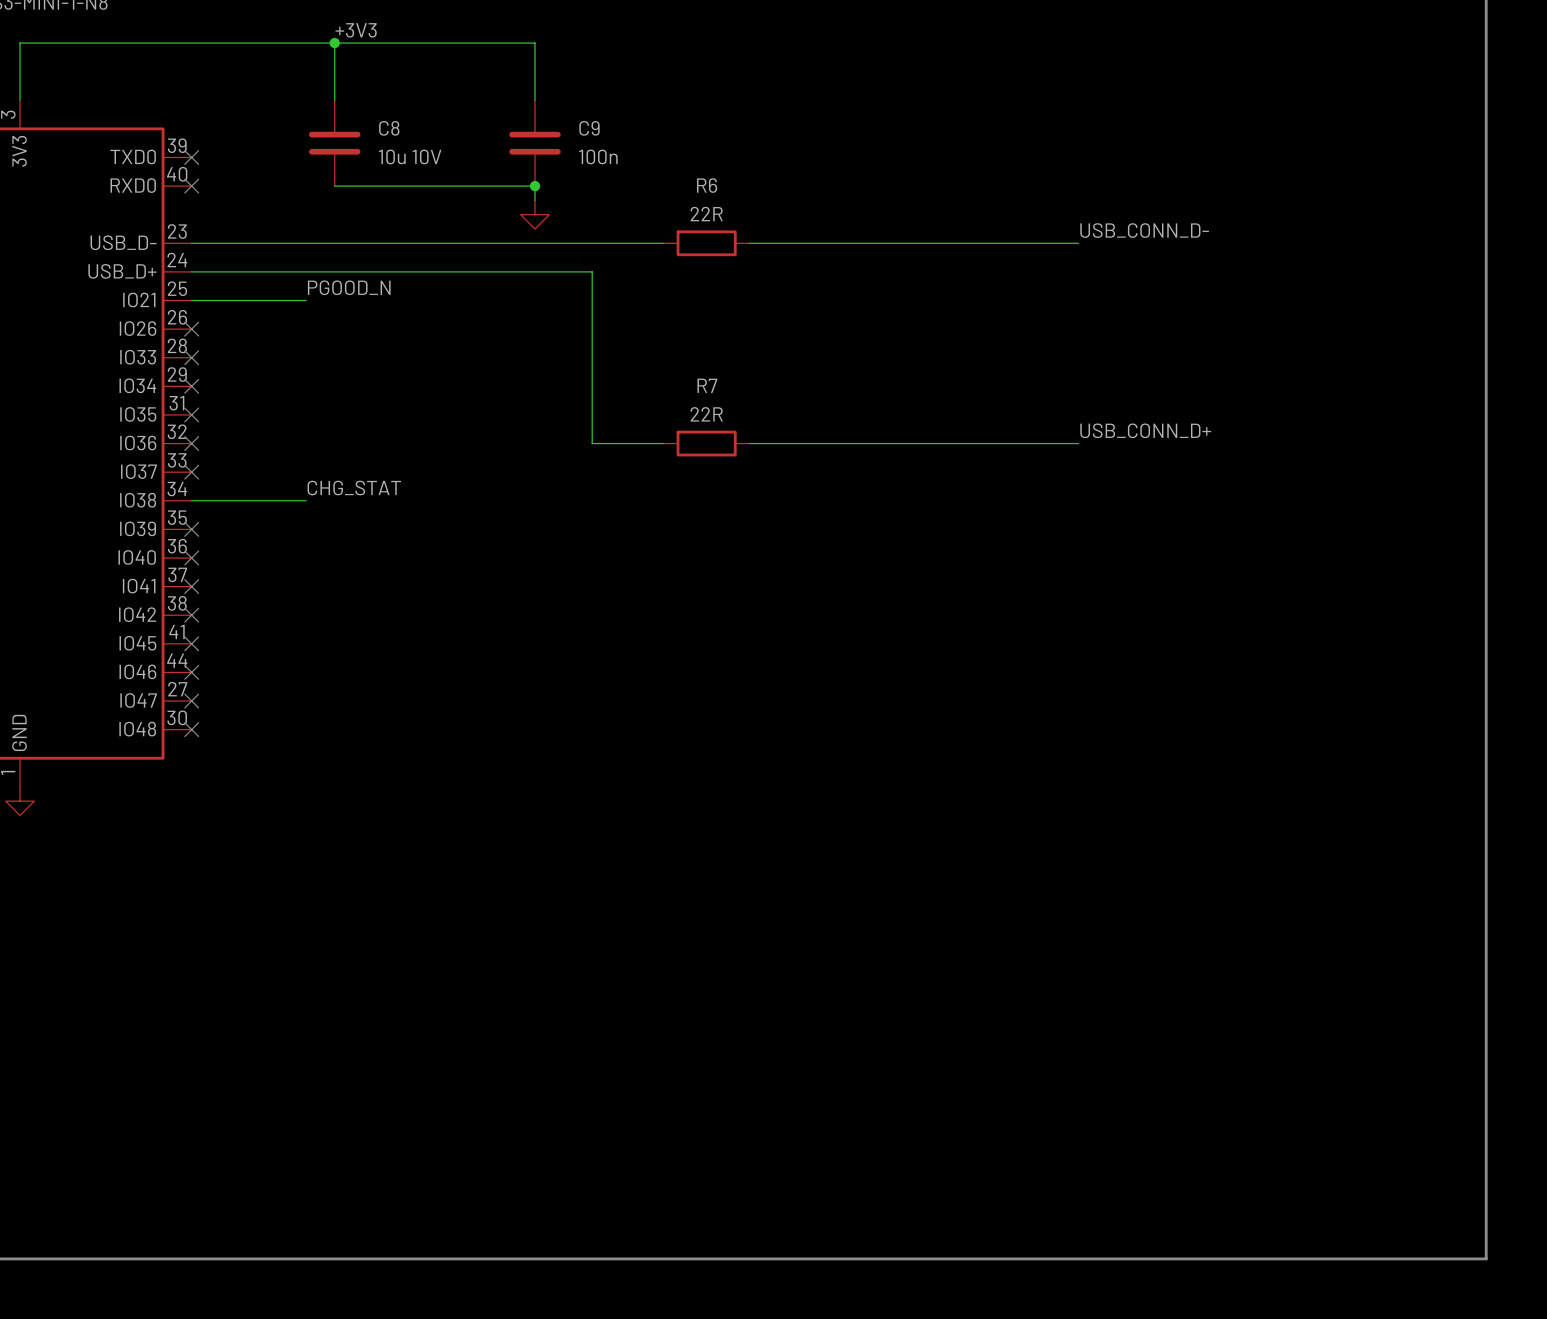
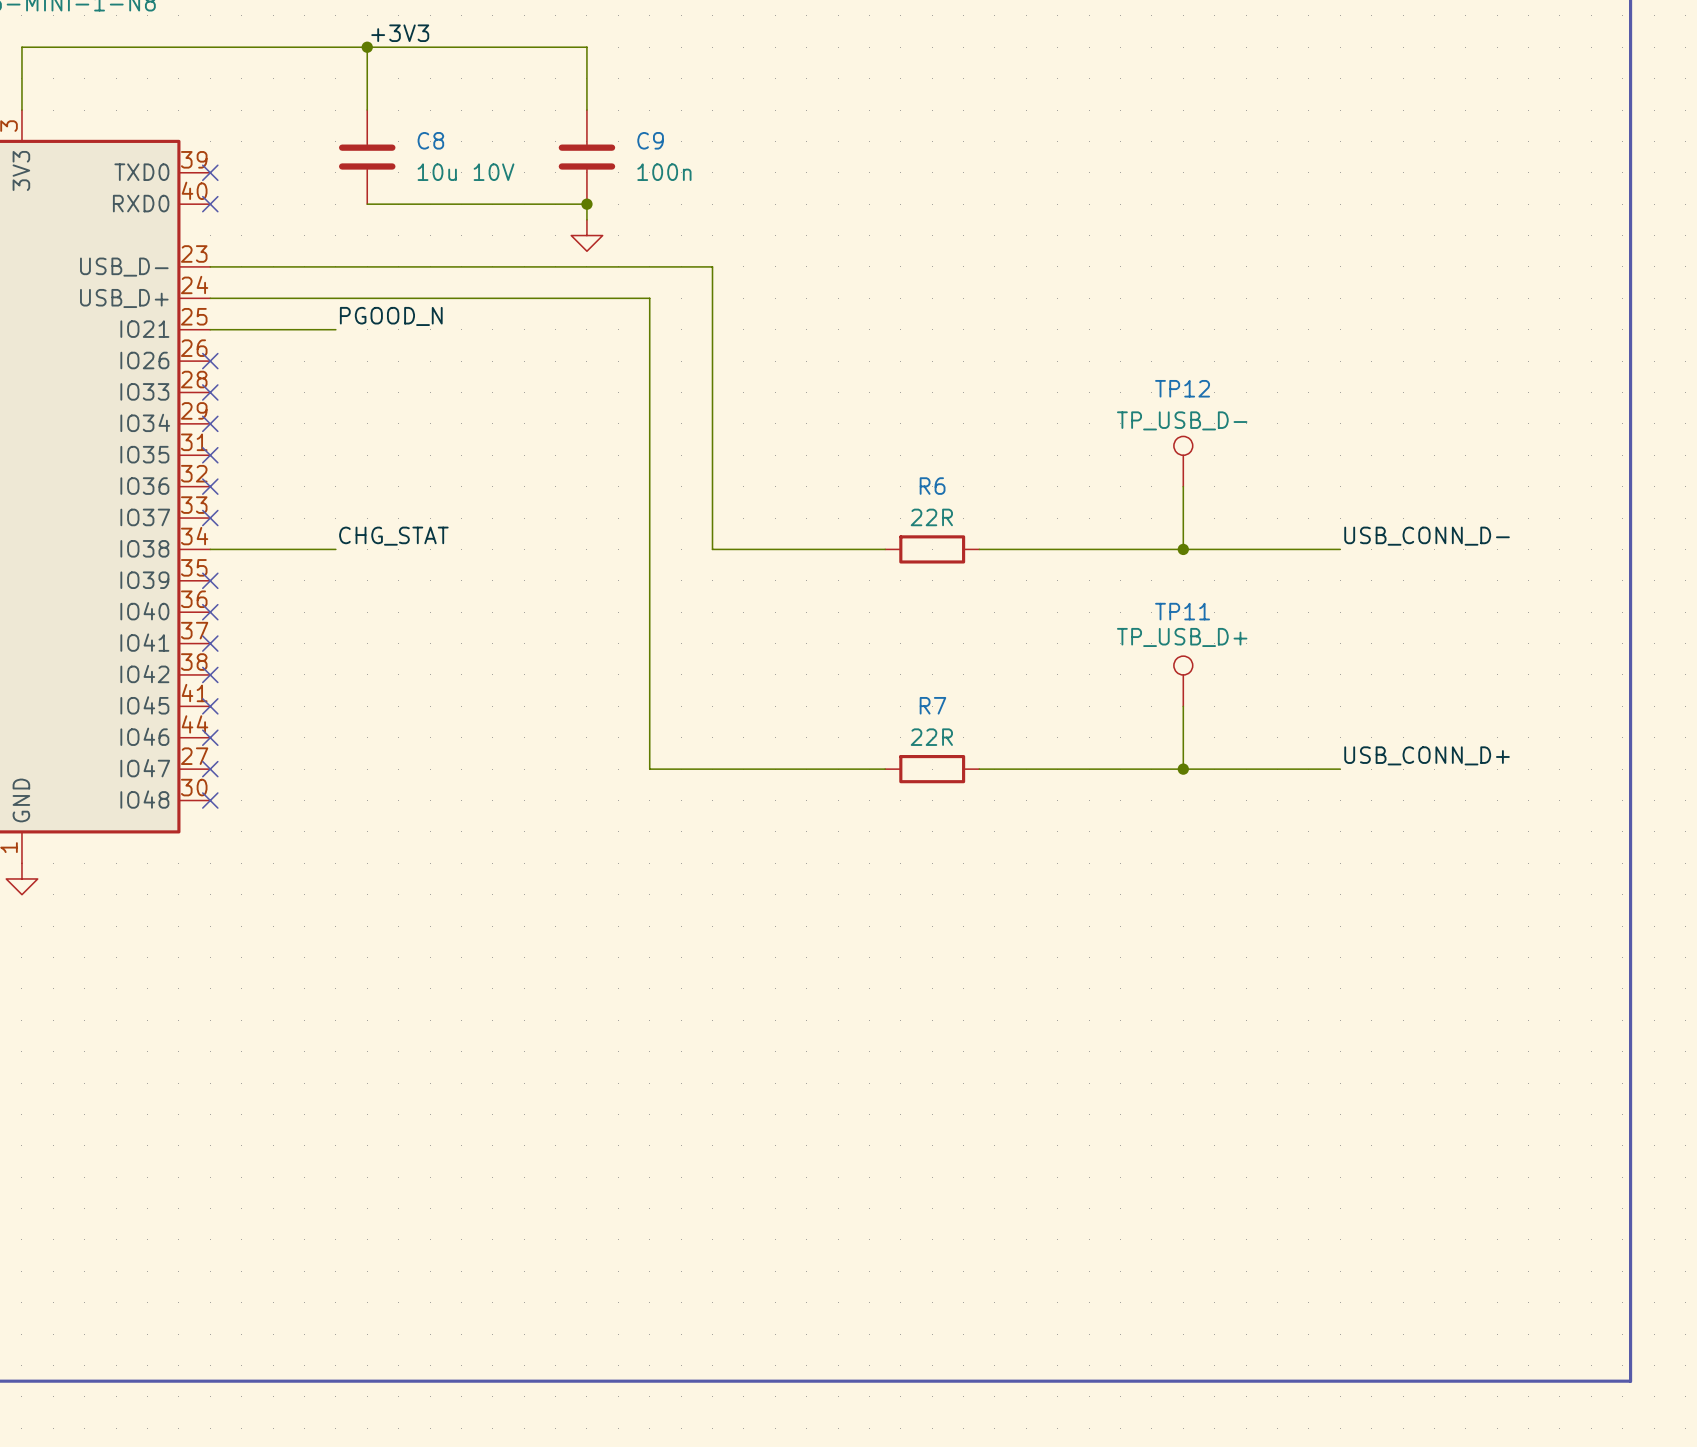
label: USB_CONN_D- (1144, 230) -> none
wire: (649, 243) (663, 243) -> (712, 266) (712, 549) (885, 549)
R6 position: (706, 243) -> (932, 549)
wire: (749, 243) (1078, 243) -> none
TP12: none -> TP_USB_D- (1183, 461)
label: USB_CONN_D+ (1145, 430) -> none
wire: (592, 443) (663, 443) -> (649, 486) (649, 769) (885, 769)
R7 position: (706, 443) -> (932, 769)
wire: (749, 443) (1078, 443) -> (1183, 549) (1183, 486)
label: none -> USB_CONN_D- (1427, 536)
wire: none -> (979, 549) (1340, 549)
junction: none -> (1183, 549)
TP11: none -> TP_USB_D+ (1183, 681)
wire: none -> (1183, 706) (1183, 769)
label: none -> USB_CONN_D+ (1427, 755)
wire: none -> (979, 769) (1340, 769)
junction: none -> (1183, 769)

